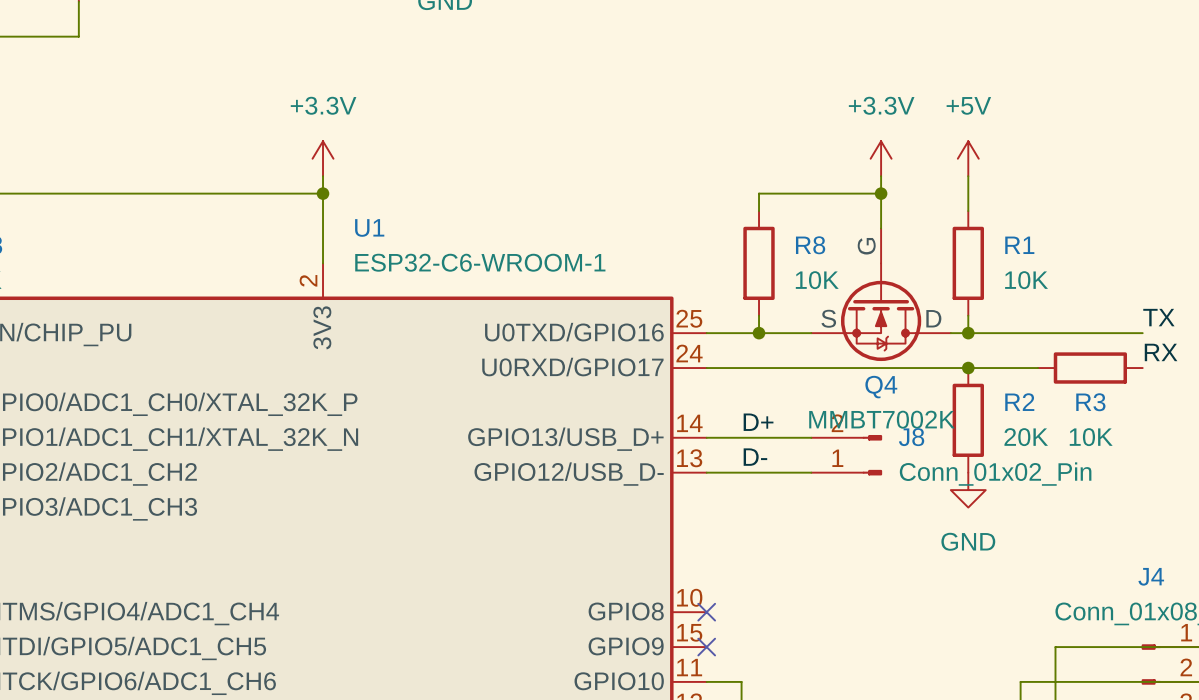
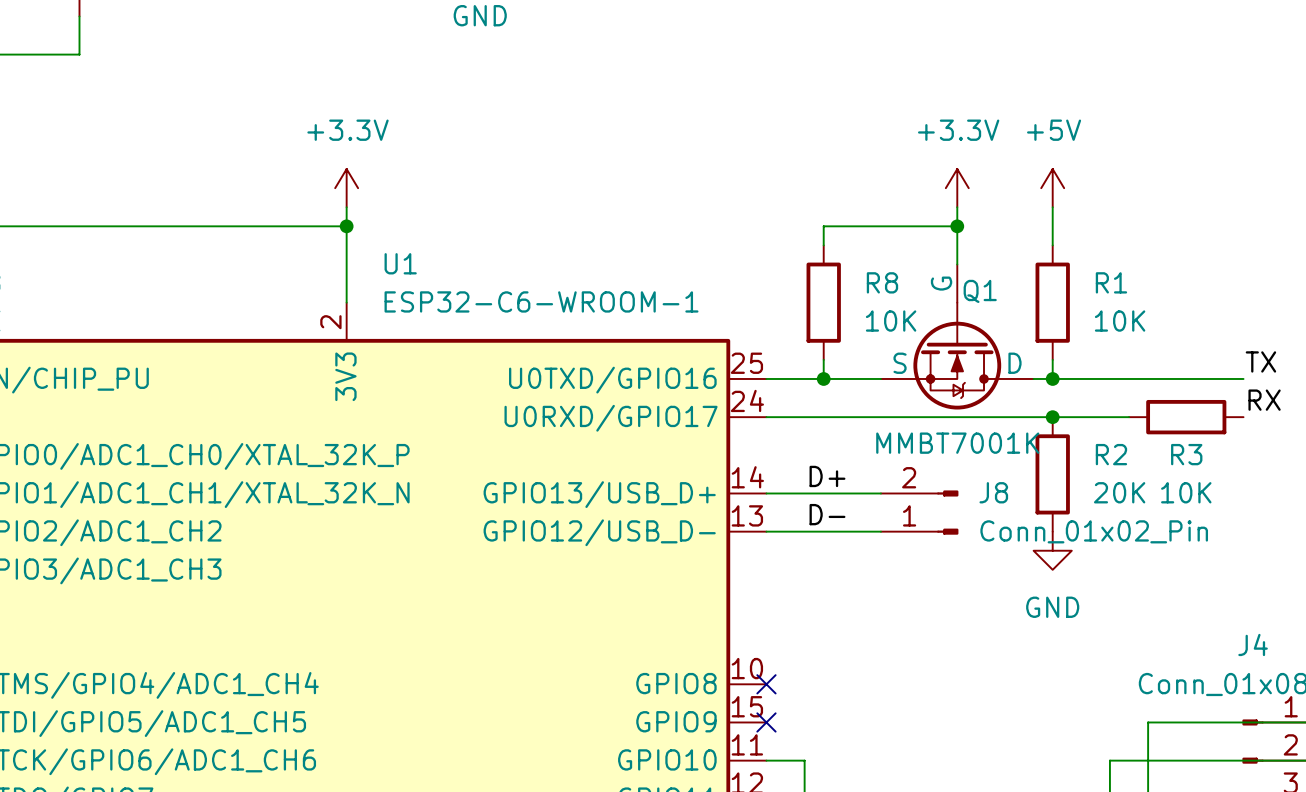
Q4 name: Q4 (881, 387) -> Q1 (980, 291)
Q4 value: MMBT7002K (881, 419) -> MMBT7001K (957, 443)

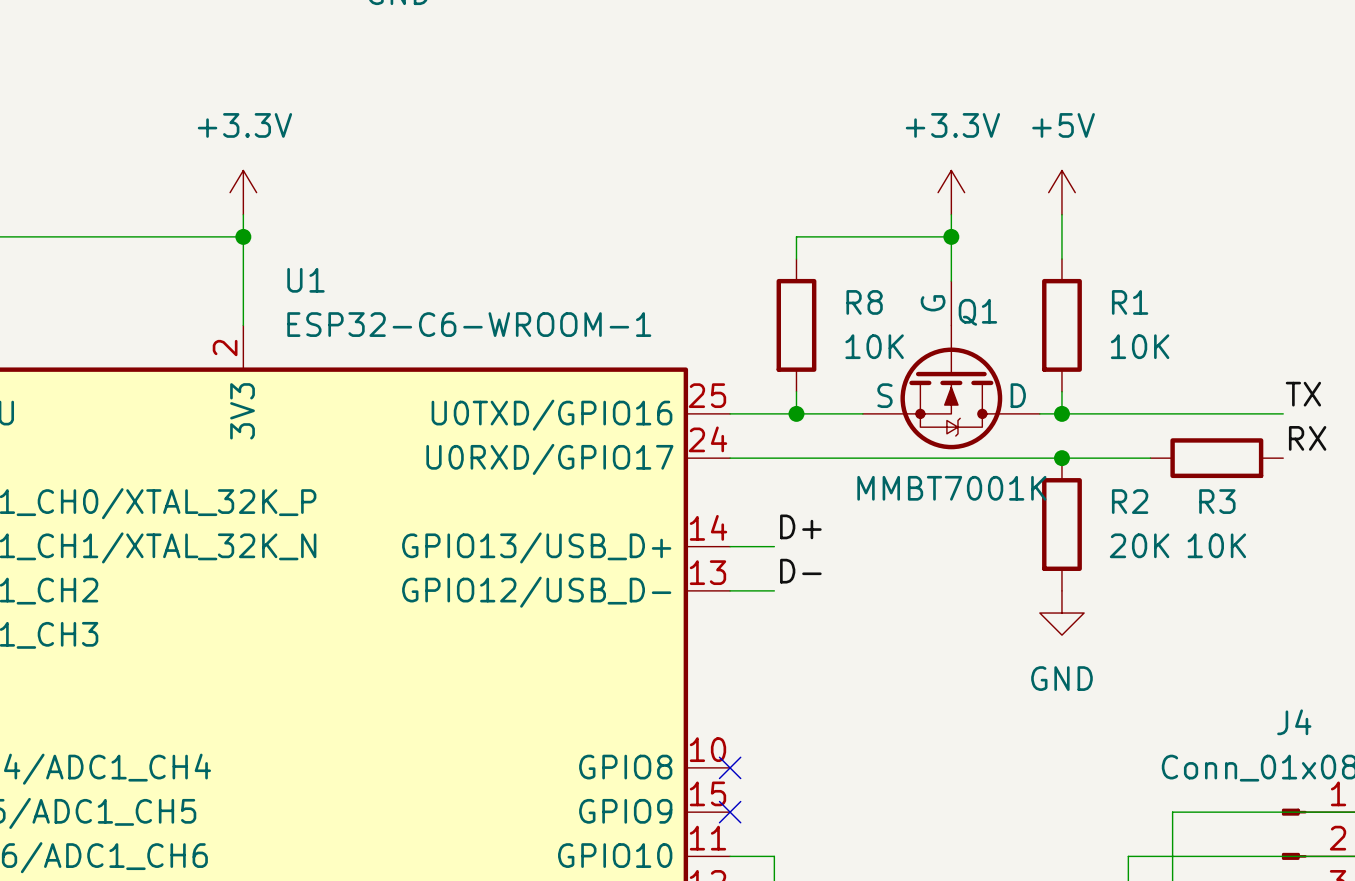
wire: (804, 493) (880, 493) -> none
J8: Conn_01x02_Pin (919, 512) -> none
wire: (804, 531) (880, 531) -> none

